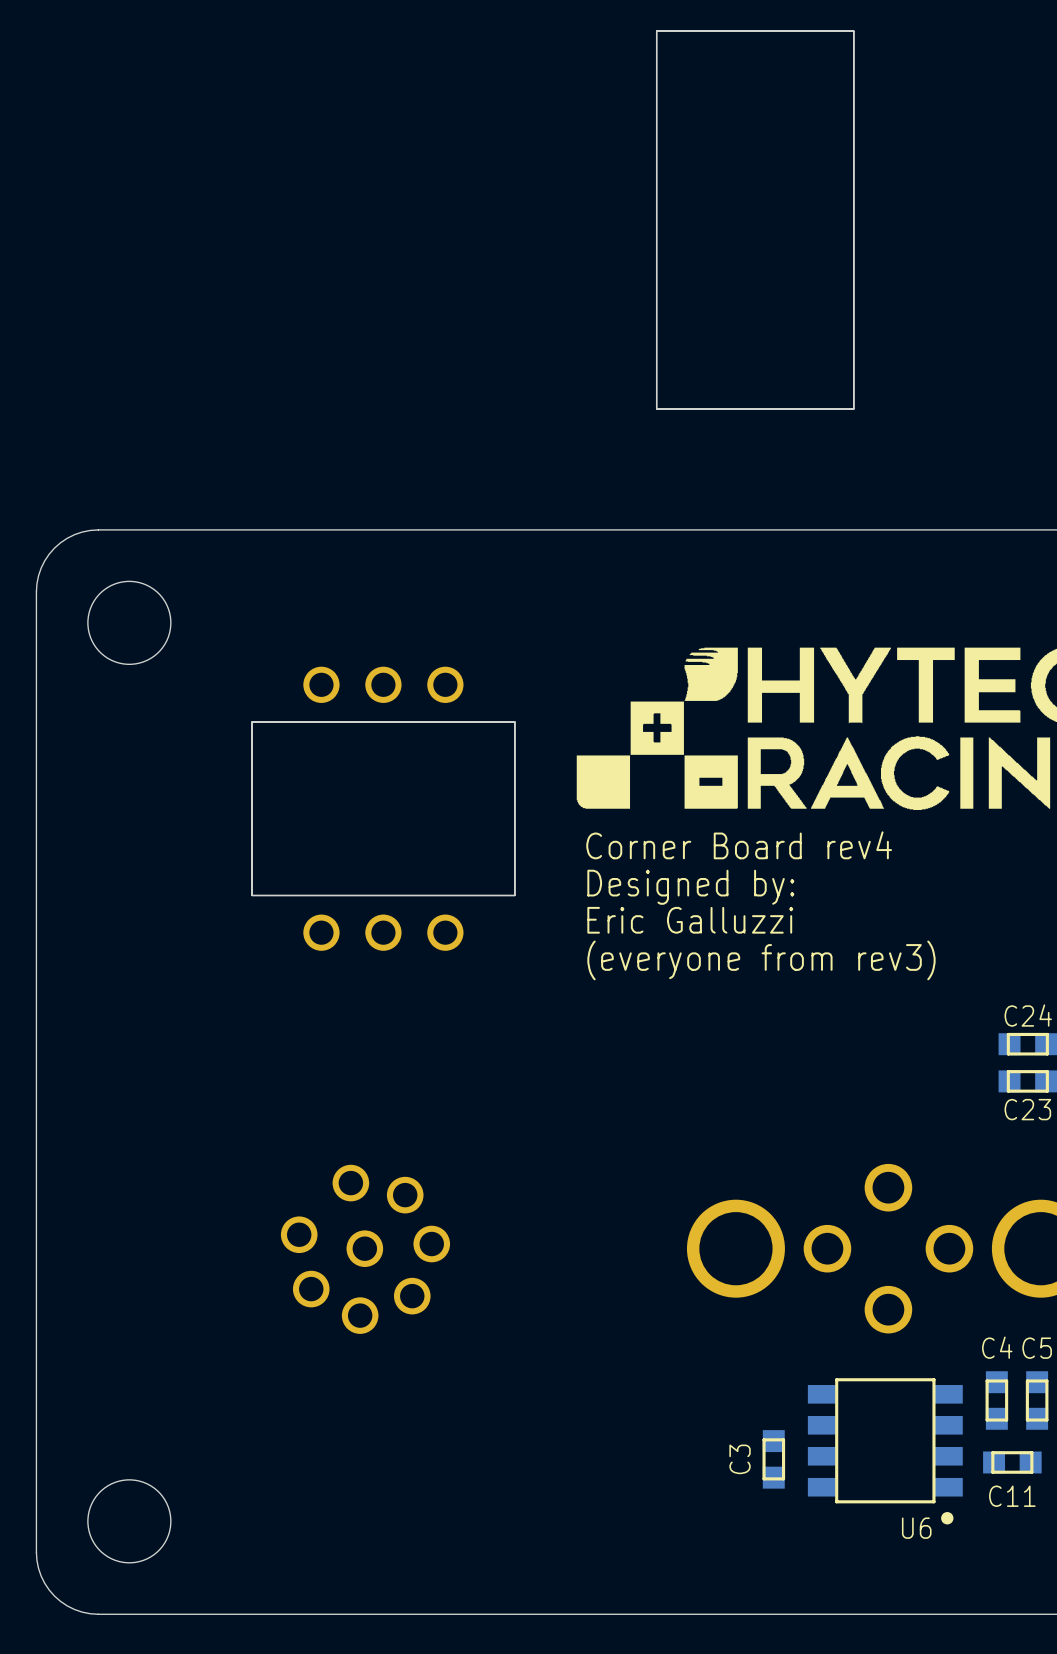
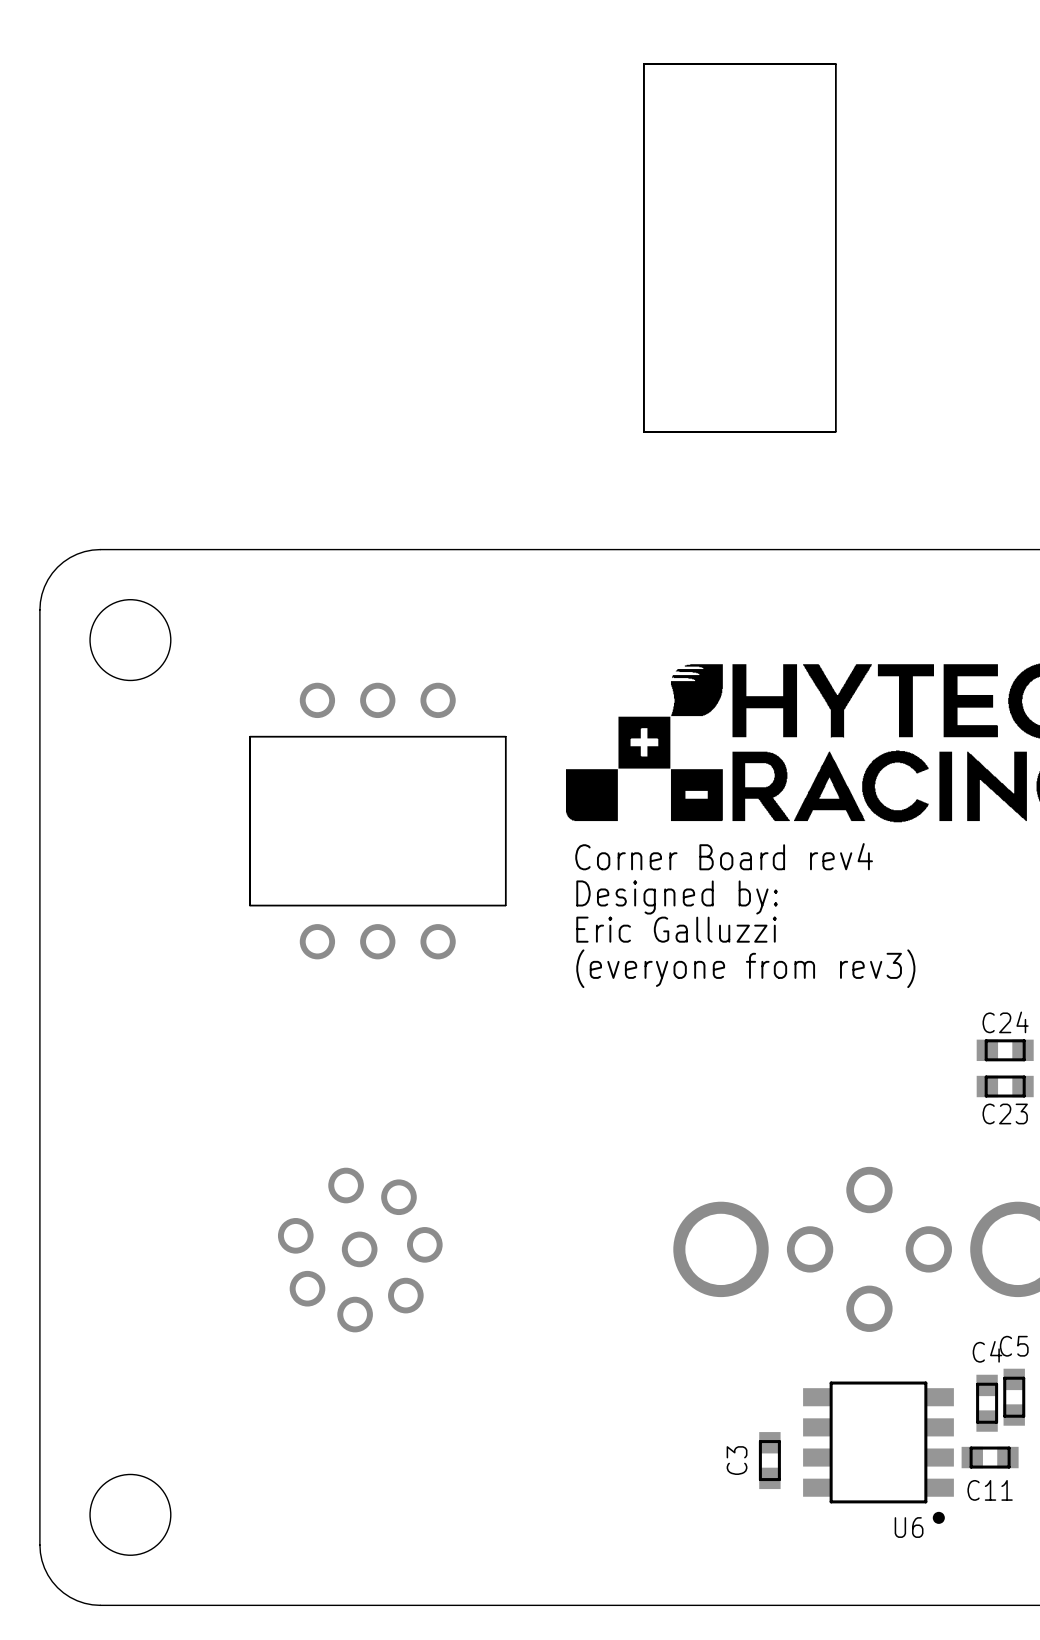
C4 position: (996, 1400) -> (987, 1403)
U6 position: (885, 1451) -> (878, 1452)
C3 position: (773, 1459) -> (769, 1460)

